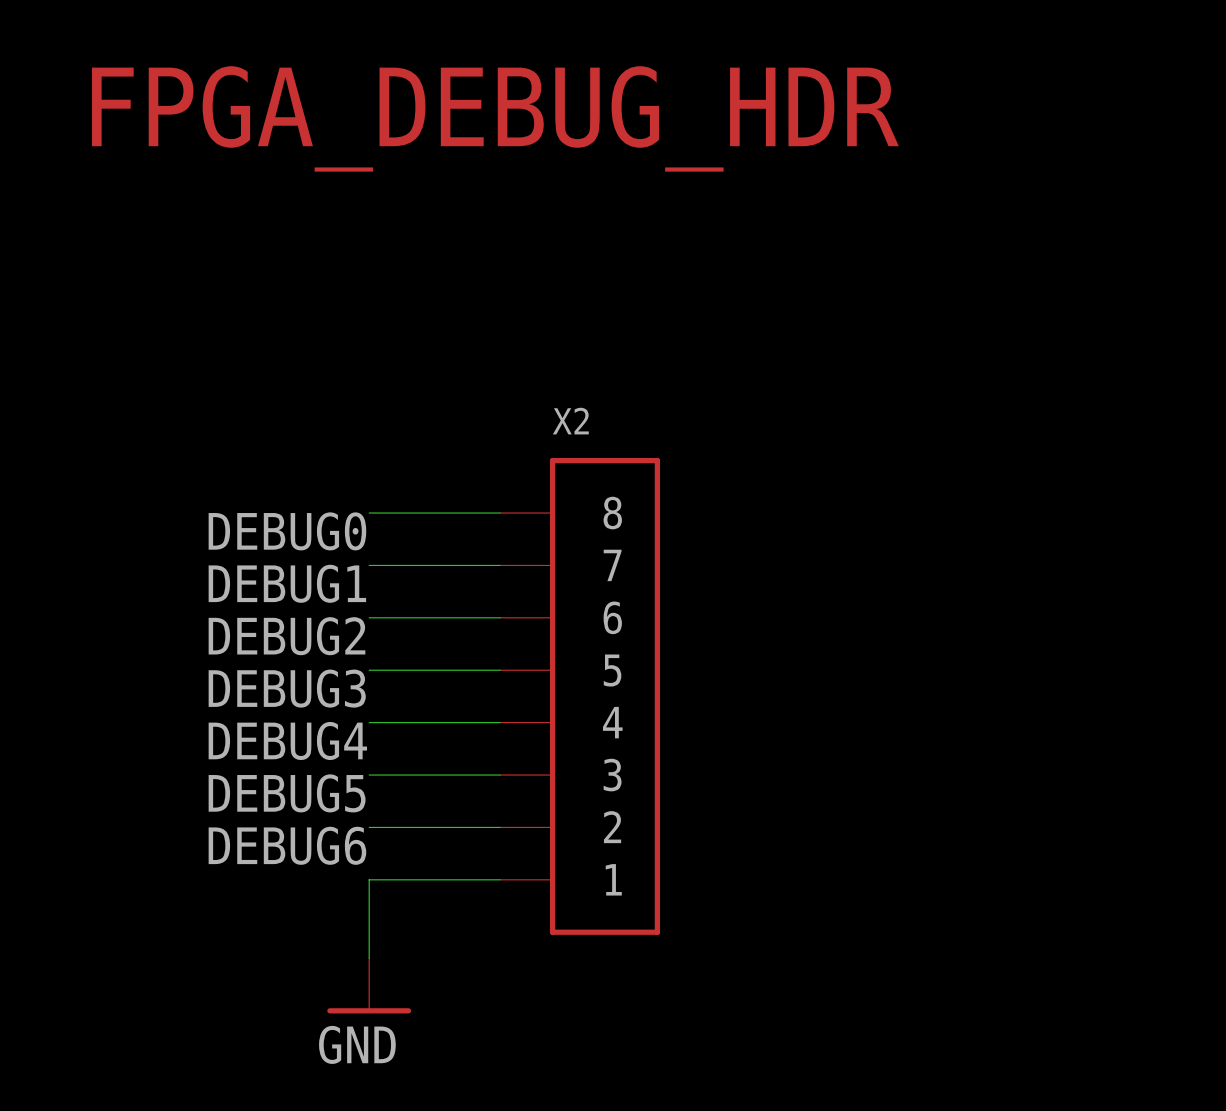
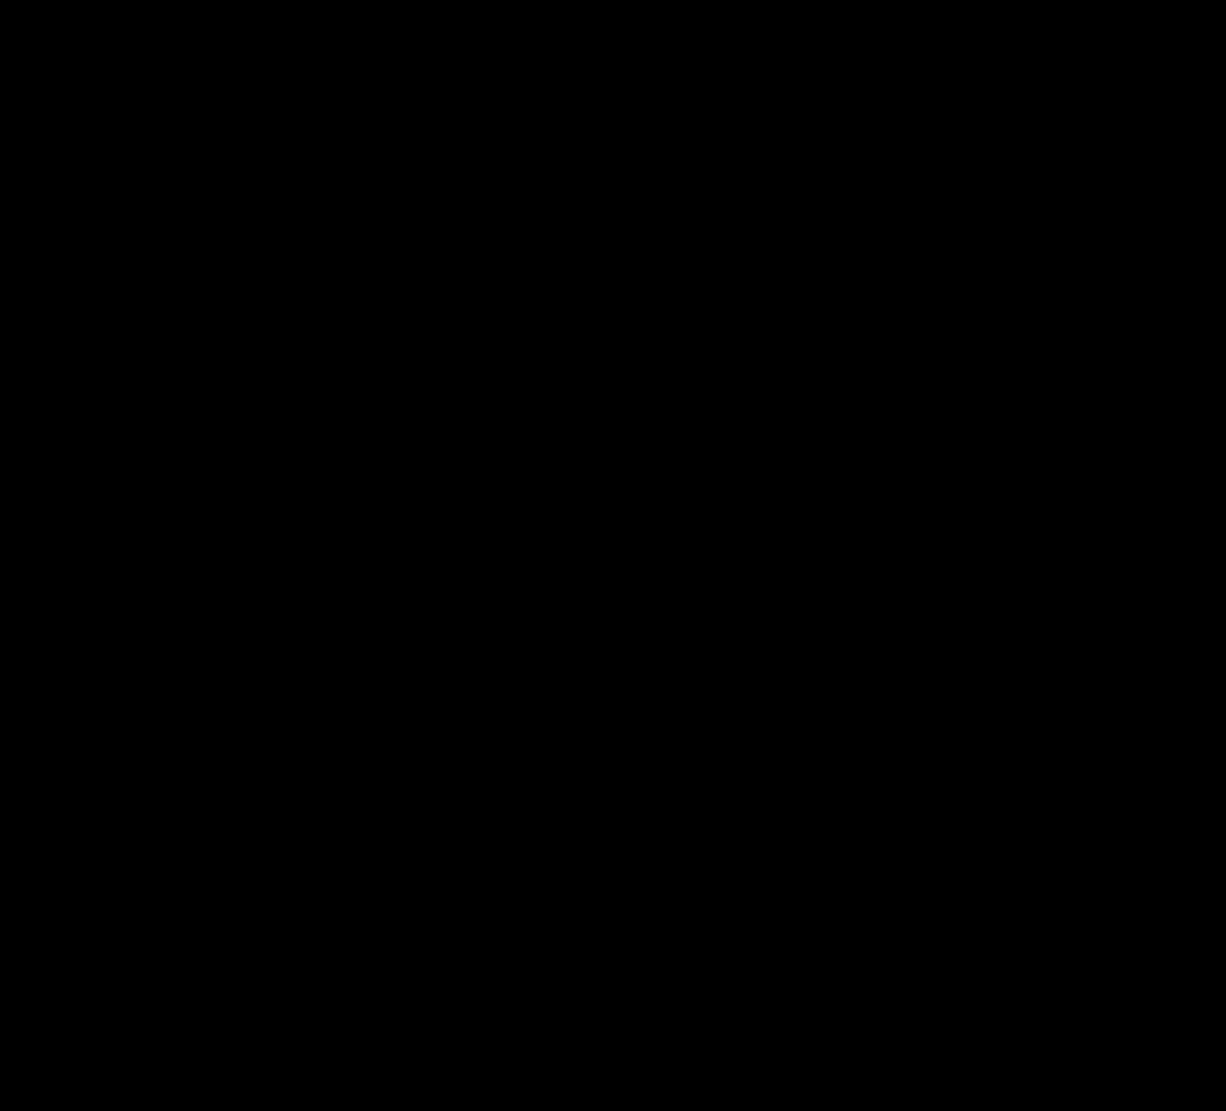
text: FPGA_DEBUG_HDR (495, 118) -> none
wire: (369, 513) (500, 513) -> none
label: DEBUG0 (287, 531) -> none
wire: (369, 565) (500, 565) -> none
label: DEBUG1 (287, 583) -> none
wire: (369, 617) (500, 617) -> none
label: DEBUG2 (286, 636) -> none
wire: (369, 670) (500, 670) -> none
label: DEBUG3 (287, 688) -> none
X2: (580, 696) -> none
wire: (369, 722) (500, 722) -> none
label: DEBUG4 (287, 740) -> none
wire: (369, 775) (500, 775) -> none
label: DEBUG5 (287, 793) -> none
wire: (369, 827) (500, 827) -> none
label: DEBUG6 (287, 845) -> none
wire: (500, 879) (369, 879) (369, 958) -> none
power symbol: GND (369, 985) -> none

